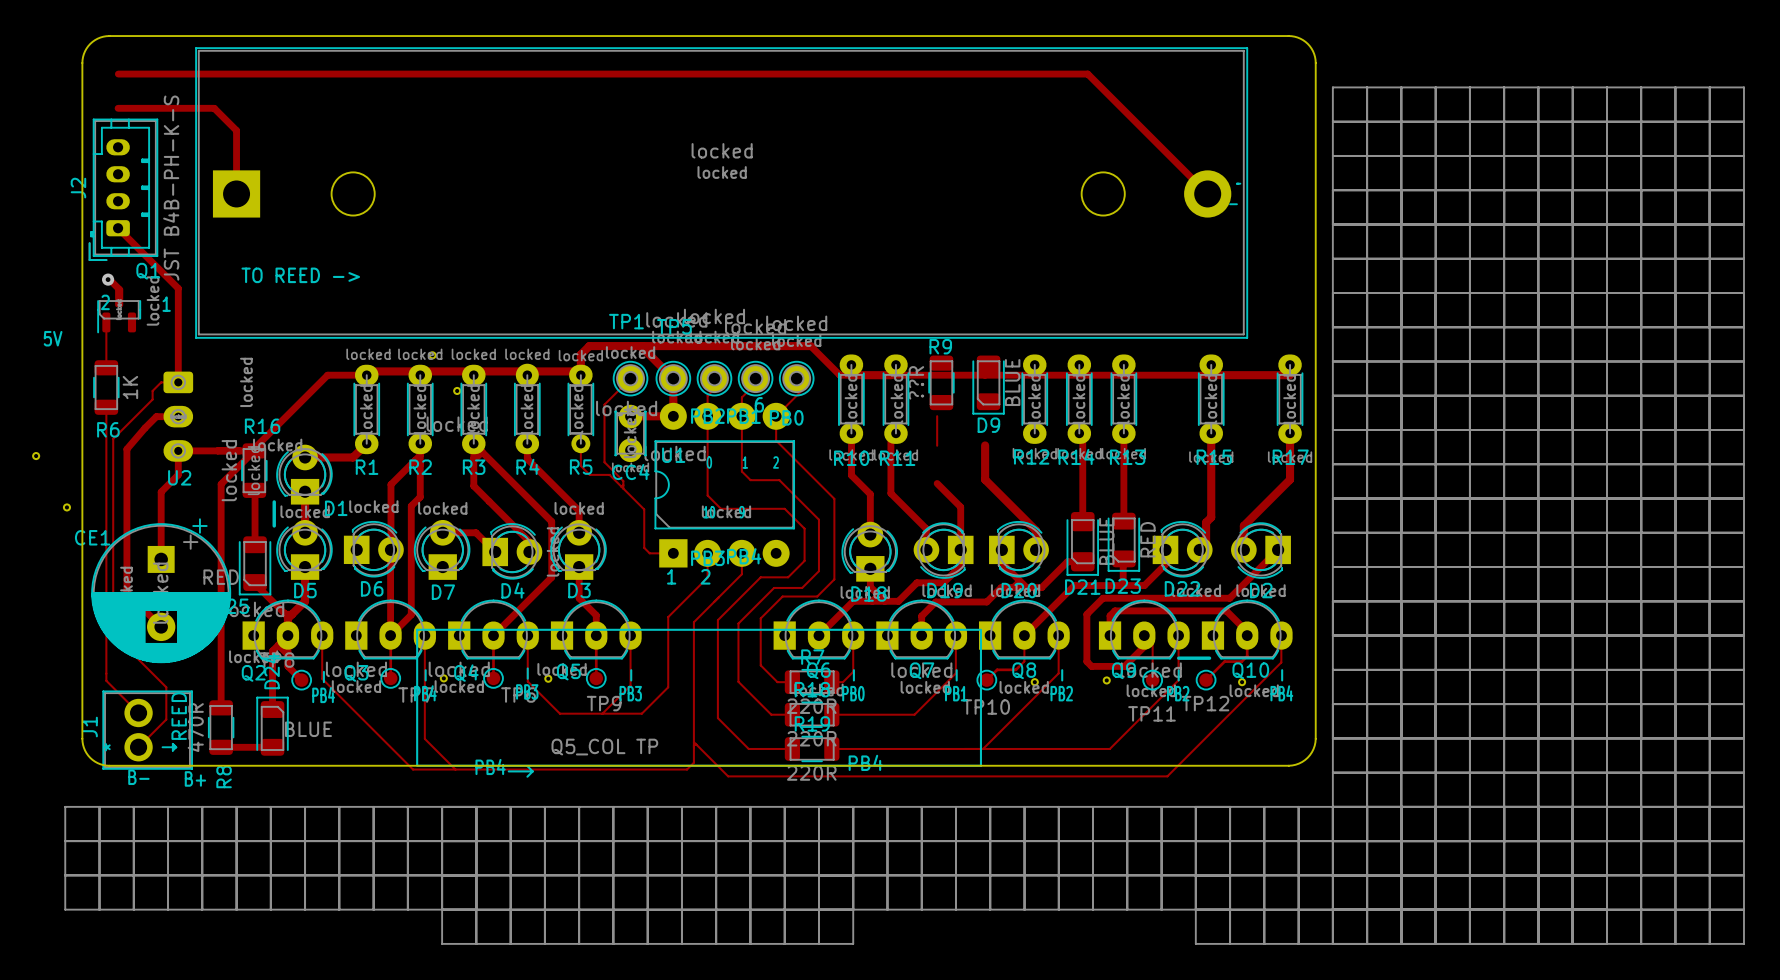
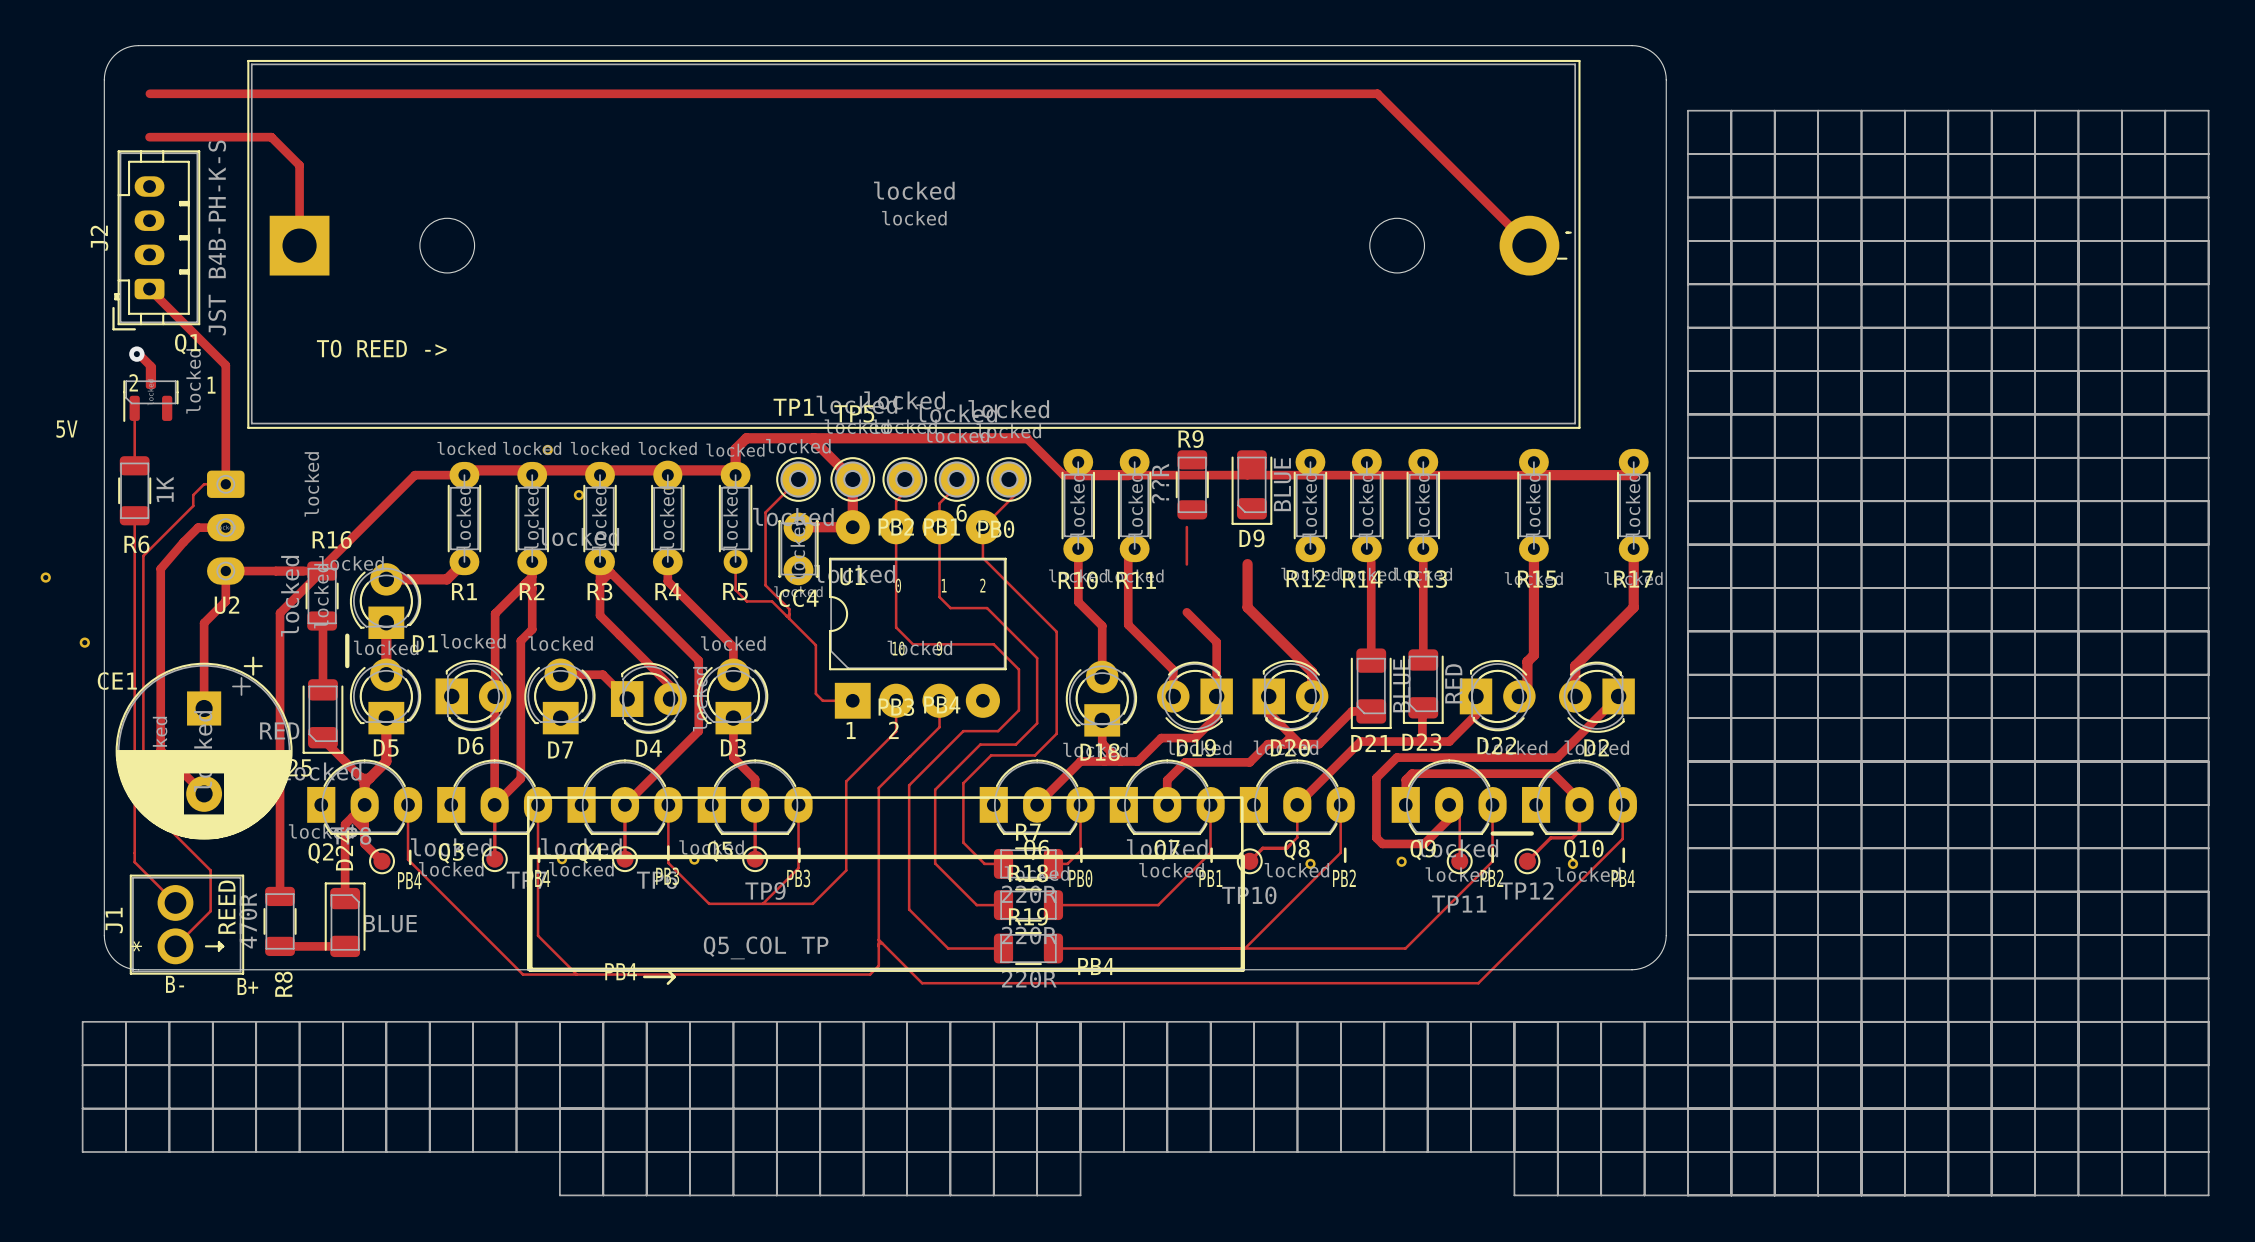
line: none -> (530, 856) (530, 969) (1242, 969) (1242, 856) (530, 856)

